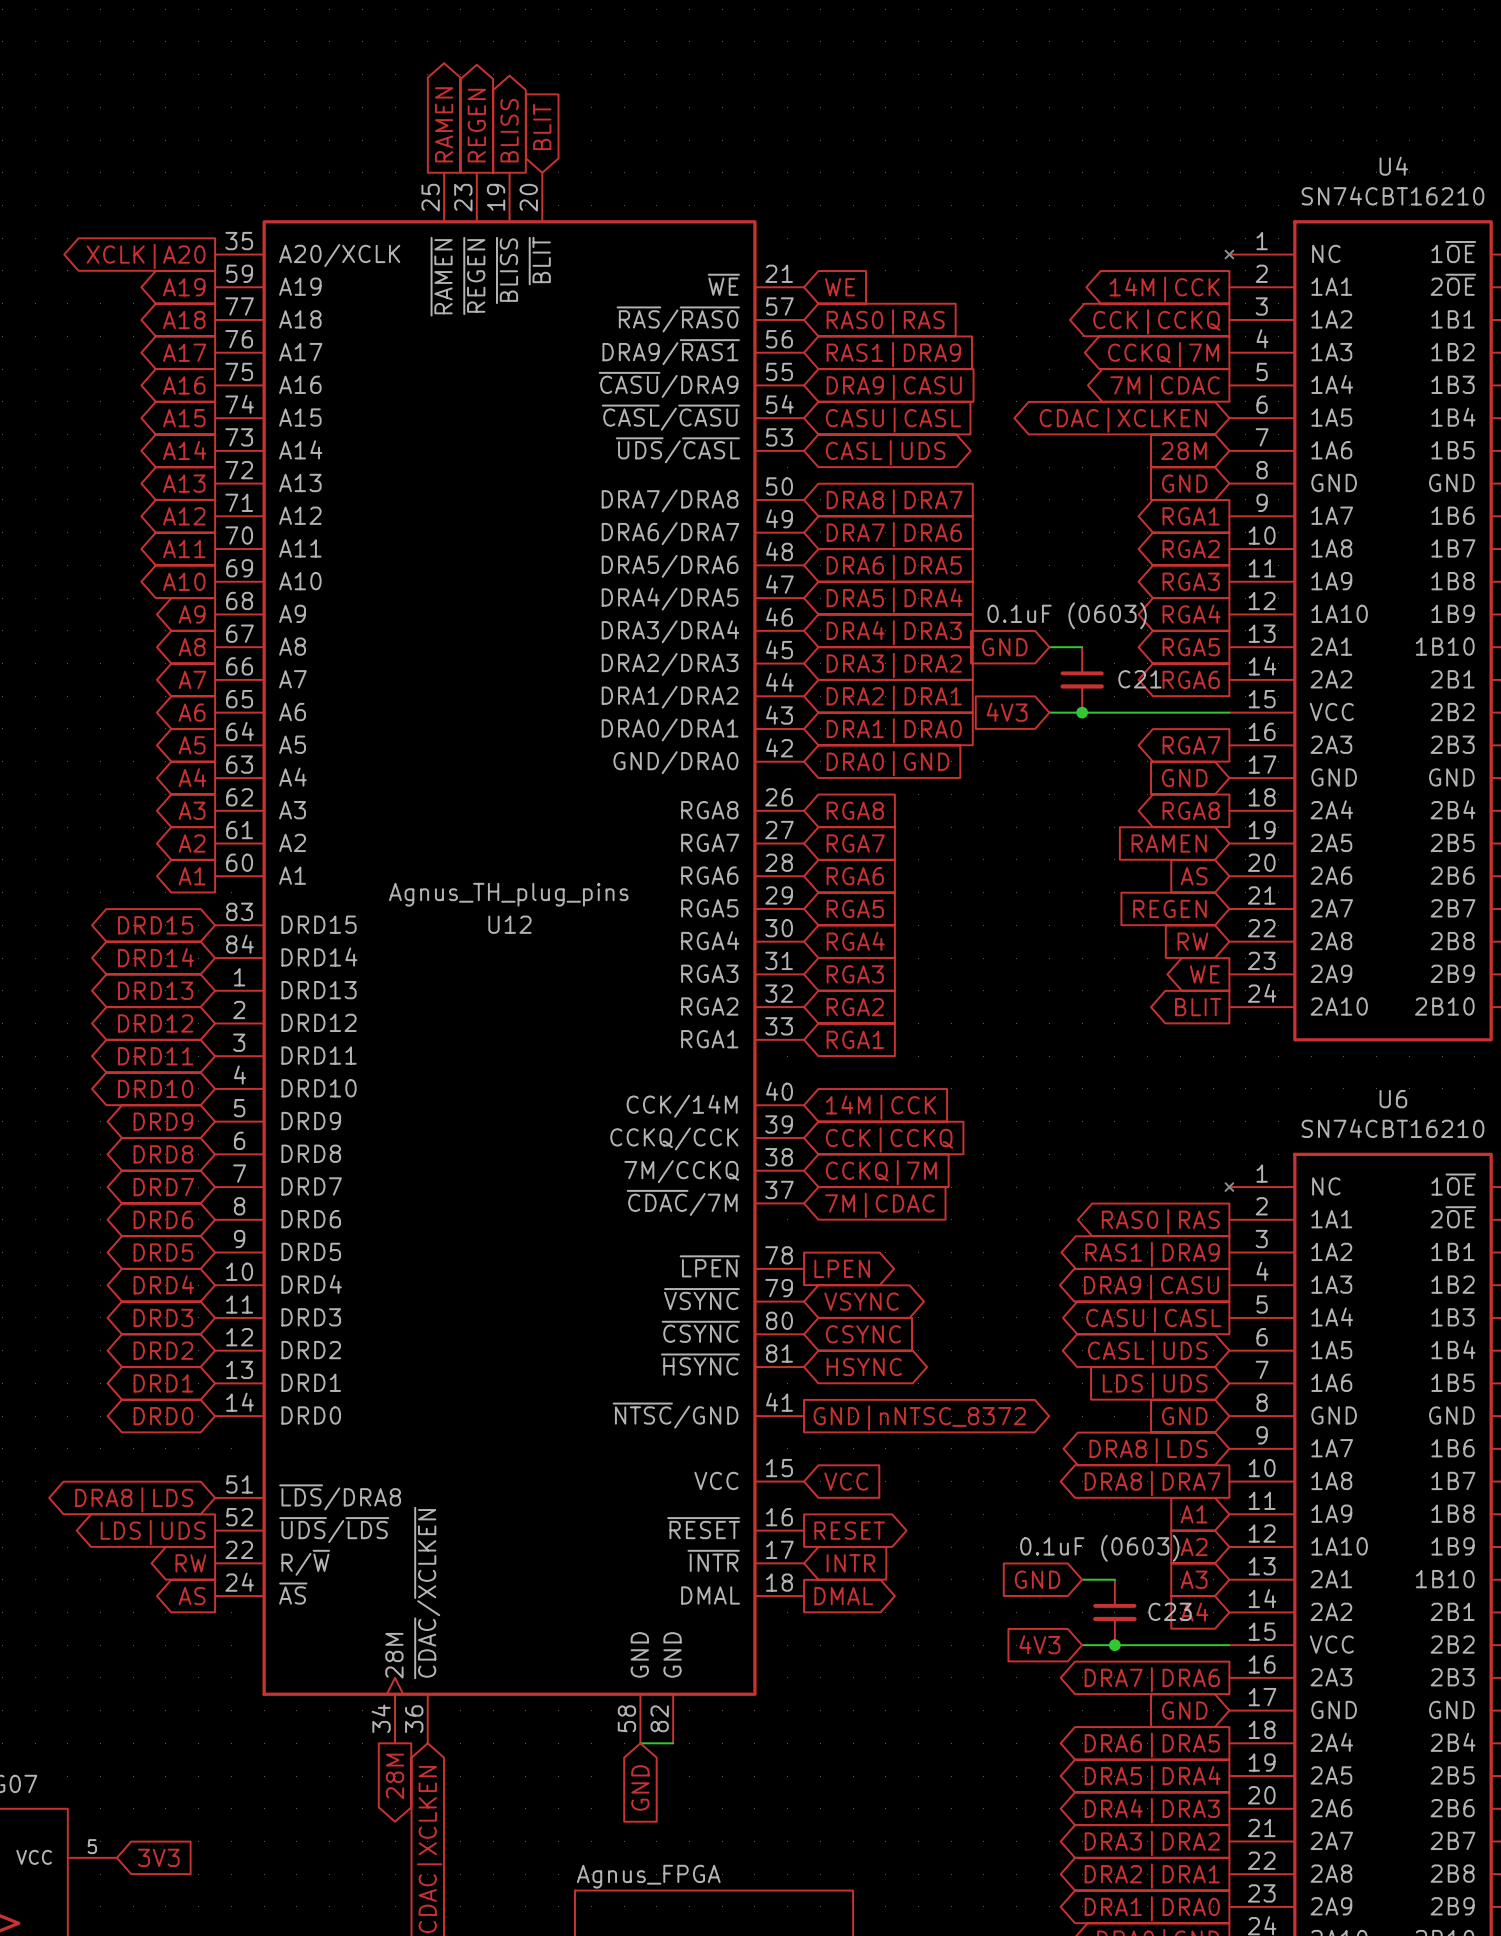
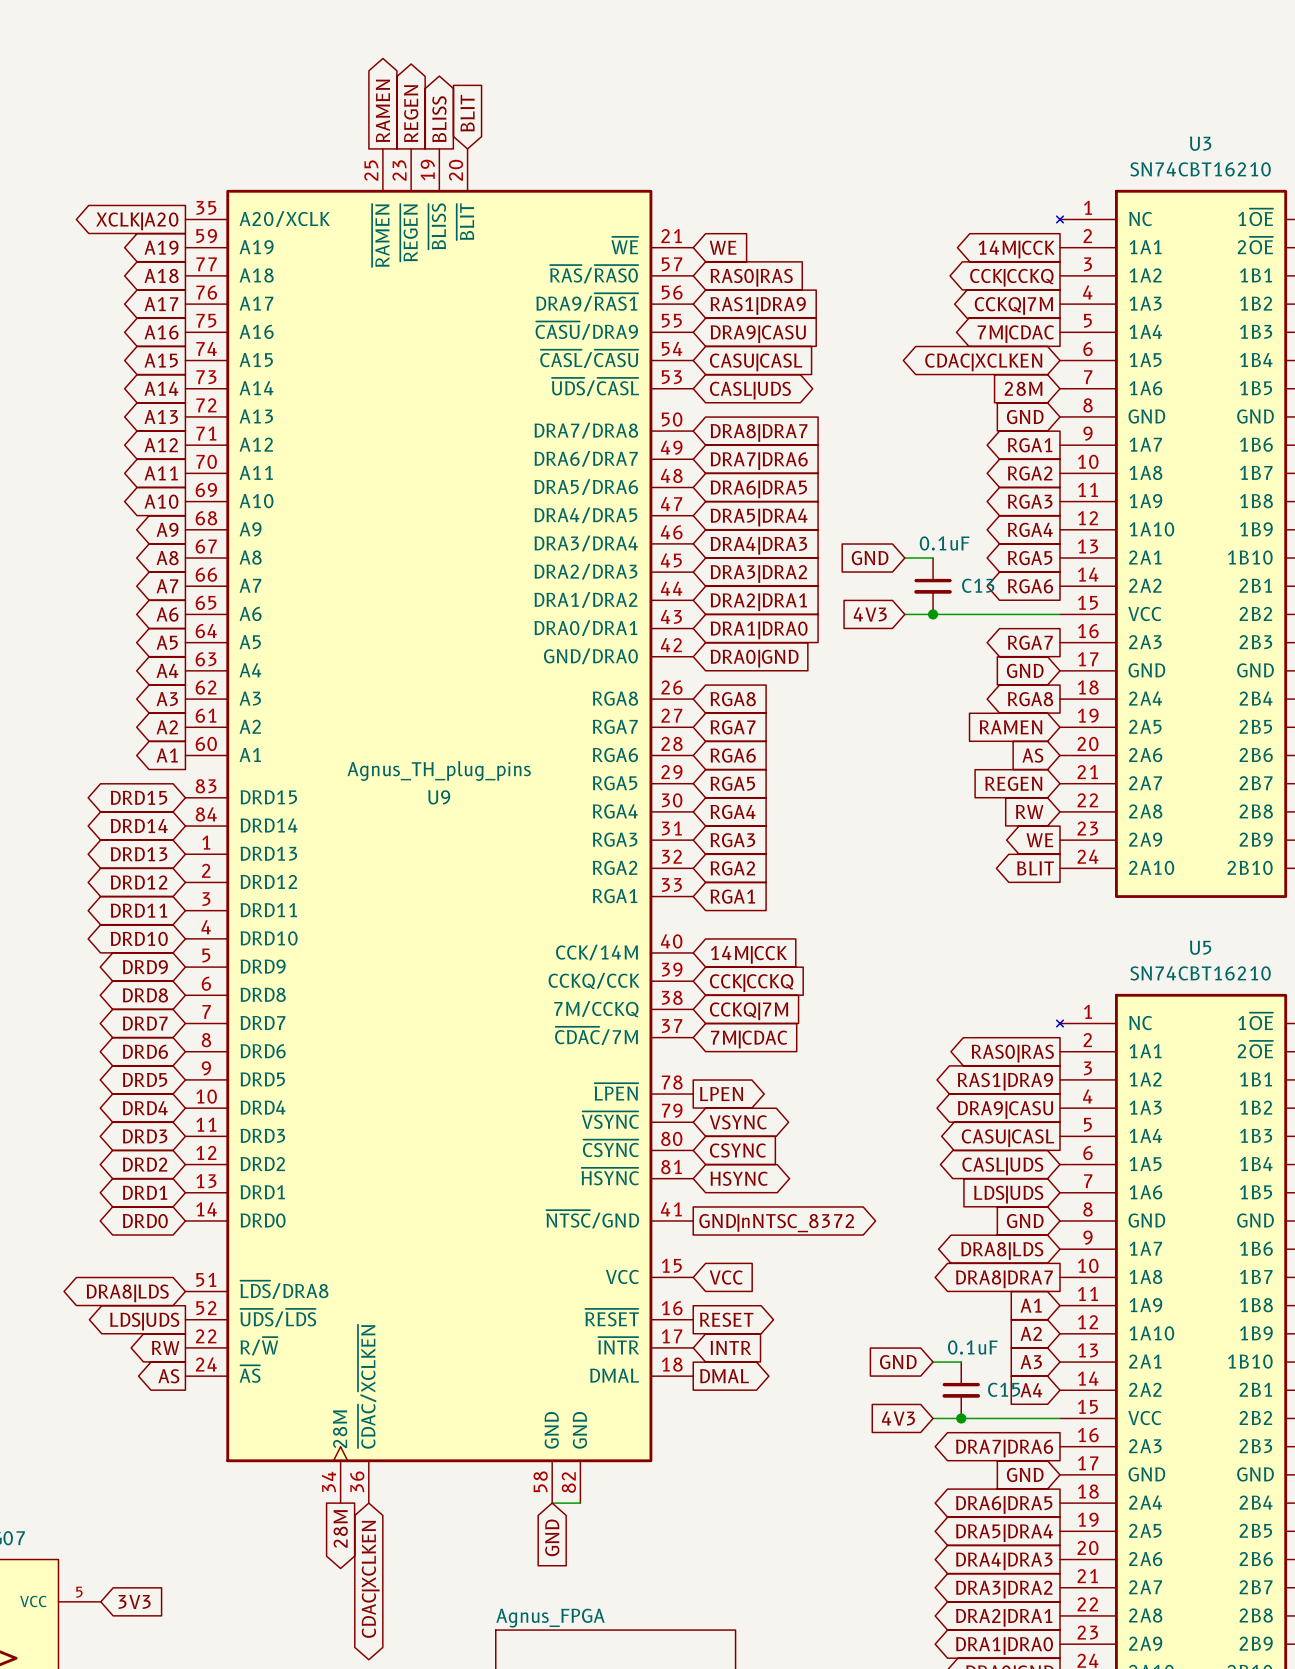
U4 name: U4 (1393, 166) -> U3 (1200, 143)
C21 value: 0.1uF (0603) (1067, 615) -> 0.1uF (944, 543)
C21 name: C21 (1139, 679) -> C13 (978, 585)
U12 name: U12 (509, 924) -> U9 (439, 797)
U6 name: U6 (1393, 1099) -> U5 (1200, 947)
C23 value: 0.1uF (0603) (1099, 1548) -> 0.1uF (972, 1347)
C23 name: C23 (1170, 1611) -> C15 (1004, 1389)

